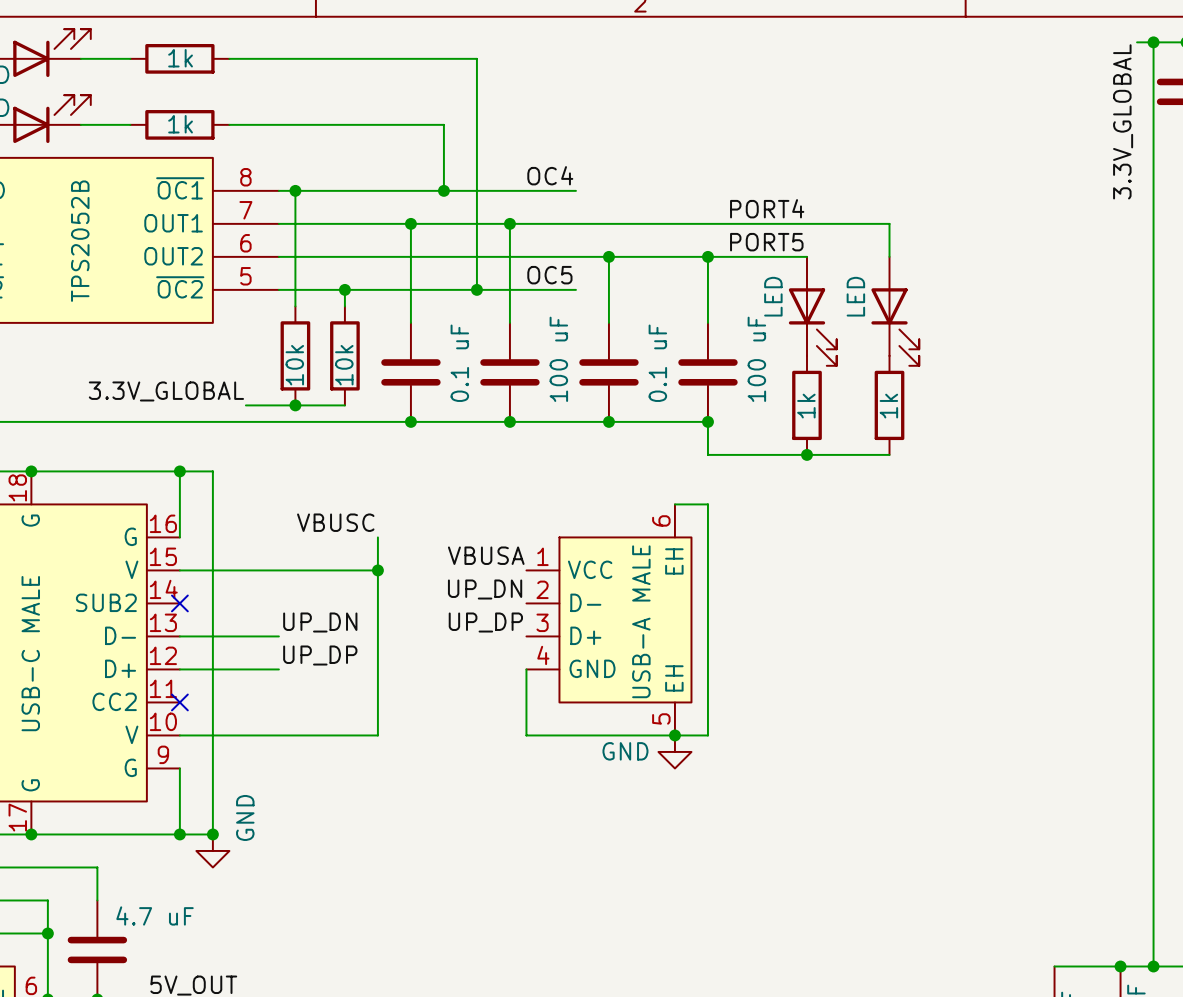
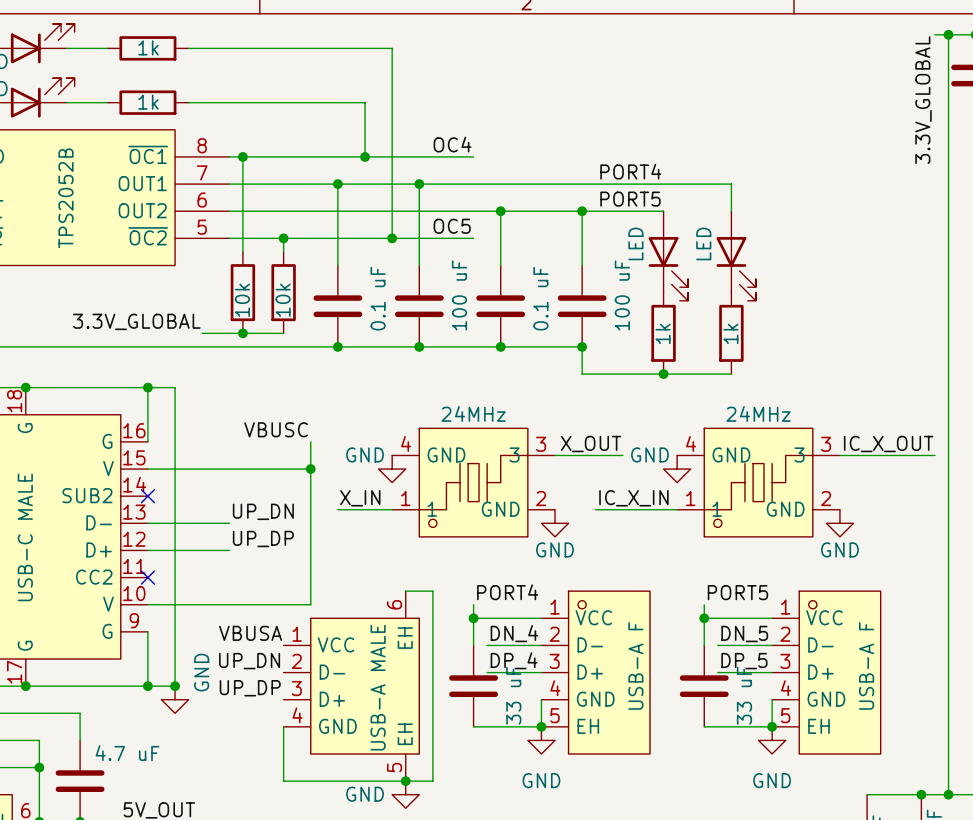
wire: (674, 504) (707, 504) (707, 735) (526, 735) -> (283, 726) (283, 781) (432, 781) (432, 604)
label: none -> X_OUT (591, 444)
label: none -> IC_X_OUT (888, 444)
wire: none -> (555, 455) (622, 455)
wire: none -> (839, 455) (934, 455)
label position: VBUSA (486, 555) -> VBUSA (250, 633)
power symbol: none -> GND (392, 469)
power symbol: none -> GND (677, 469)
part: none -> 24MHz (473, 482)
part: none -> 24MHz (758, 482)
label position: UP_DN (485, 589) -> UP_DN (249, 661)
label: none -> X_IN (360, 498)
label: none -> IC_X_IN (633, 498)
wire: none -> (337, 509) (392, 509)
part position: (608, 619) -> (351, 686)
wire: none -> (595, 509) (677, 509)
label position: UP_DP (485, 622) -> UP_DP (250, 688)
power symbol: none -> GND (555, 523)
power symbol: none -> GND (839, 523)
wire: (526, 669) (526, 718) -> (405, 591) (432, 591)
label: none -> PORT4 (507, 592)
label: none -> PORT5 (737, 592)
wire: none -> (473, 604) (473, 645)
junction: (674, 735) -> none
wire: none -> (704, 604) (704, 645)
wire: none -> (473, 618) (541, 618)
junction: none -> (473, 618)
power symbol: GND (674, 751) -> none
wire: none -> (704, 618) (772, 618)
junction: none -> (704, 618)
label: none -> DN_4 (514, 633)
label: none -> DN_5 (744, 633)
wire: none -> (487, 645) (541, 645)
wire: none -> (717, 645) (772, 645)
label: none -> DP_4 (514, 660)
label: none -> DP_5 (744, 661)
wire: none -> (487, 672) (541, 672)
part: none -> USB-A F (595, 672)
wire: none -> (717, 672) (772, 672)
part: none -> USB-A F (826, 672)
part: none -> 33 uF (473, 686)
part: none -> 33 uF (704, 686)
wire: none -> (541, 699) (541, 726) (473, 726)
wire: none -> (772, 699) (772, 726) (704, 726)
junction: none -> (541, 726)
junction: none -> (772, 726)
power symbol: none -> GND (541, 740)
power symbol: none -> GND (772, 740)
junction: none -> (405, 781)
power symbol: none -> GND (405, 794)

